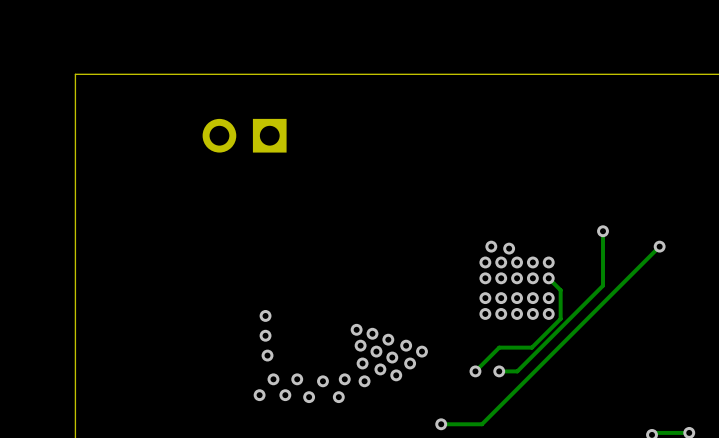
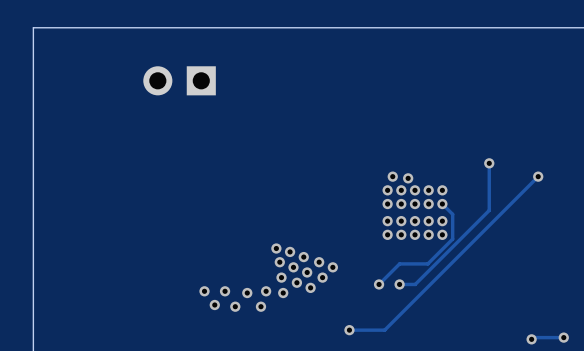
via: (265, 315) -> none
via: (265, 335) -> none
via: (267, 355) -> none
via: (259, 395) -> none

